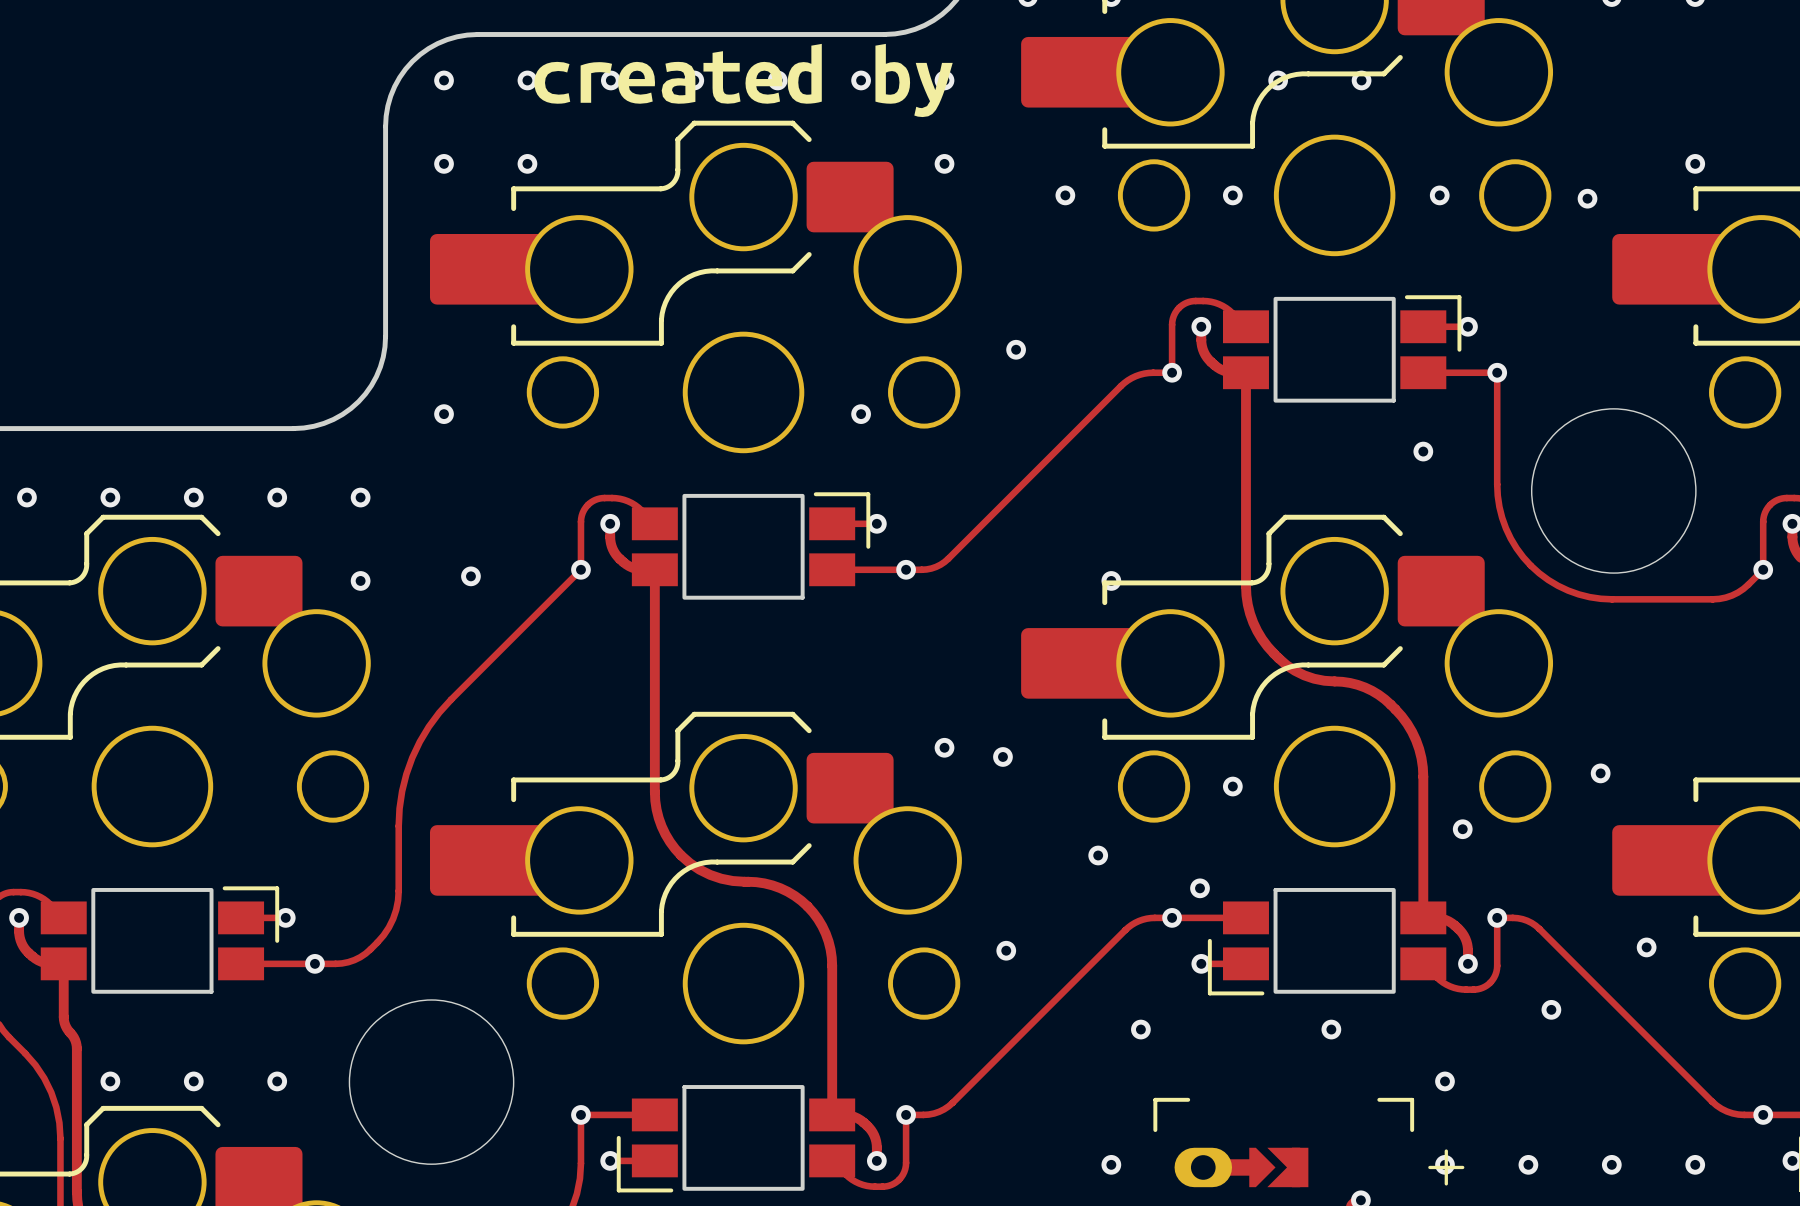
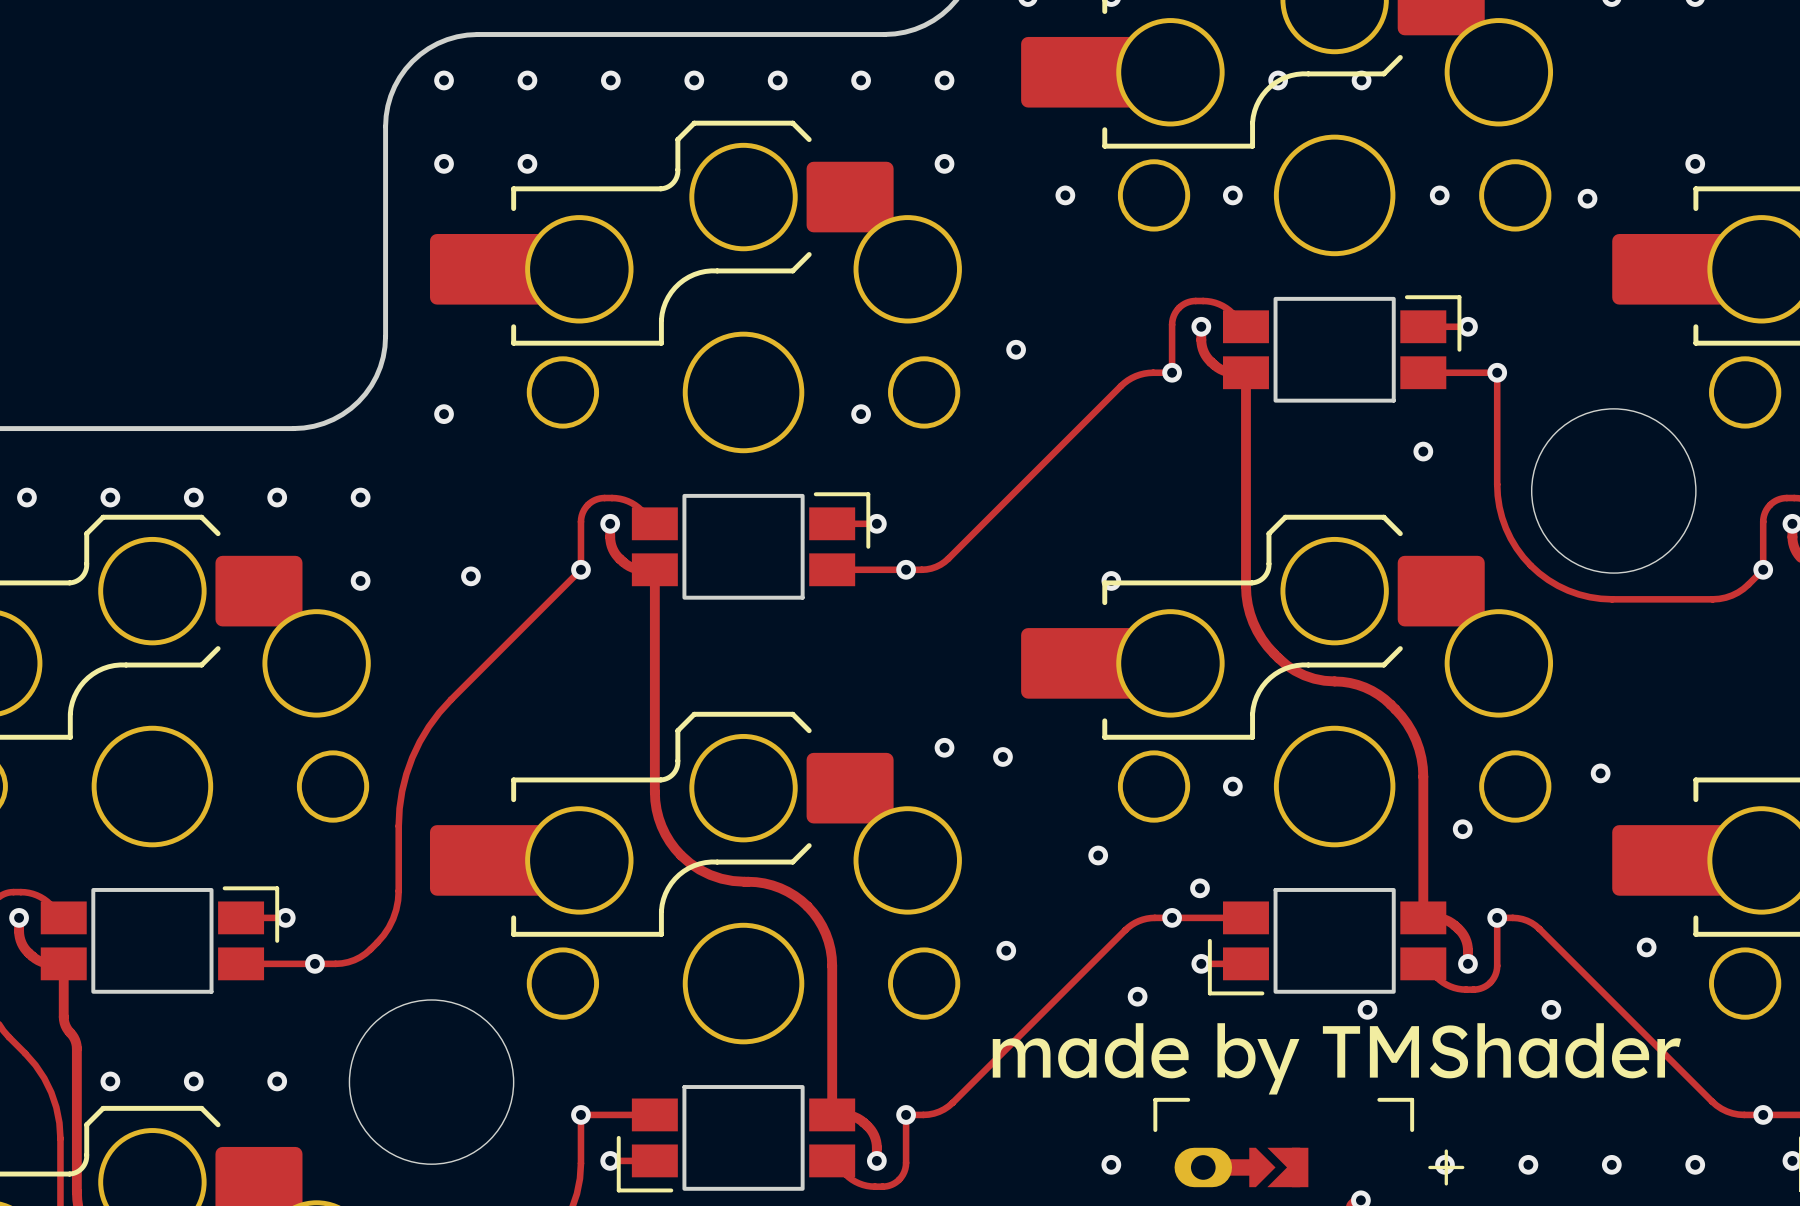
drawing: [534, 43, 953, 118] -> none
drawing: none -> [992, 1023, 1681, 1095]
via position: (1140, 1029) -> (1137, 996)
via position: (1331, 1029) -> (1367, 1009)
via: (1444, 1081) -> none

